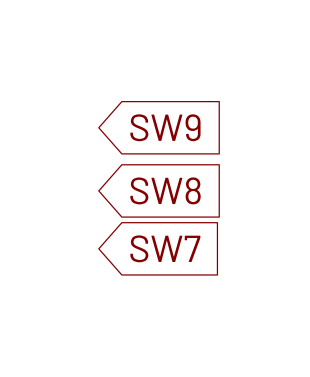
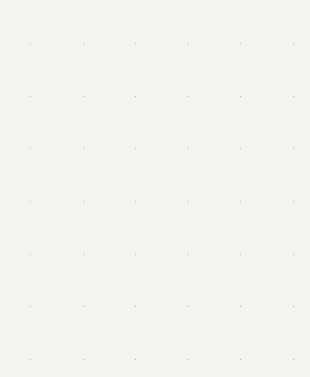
global label: SW9 (165, 127) -> none
global label: SW8 (165, 190) -> none
global label: SW7 (165, 248) -> none

